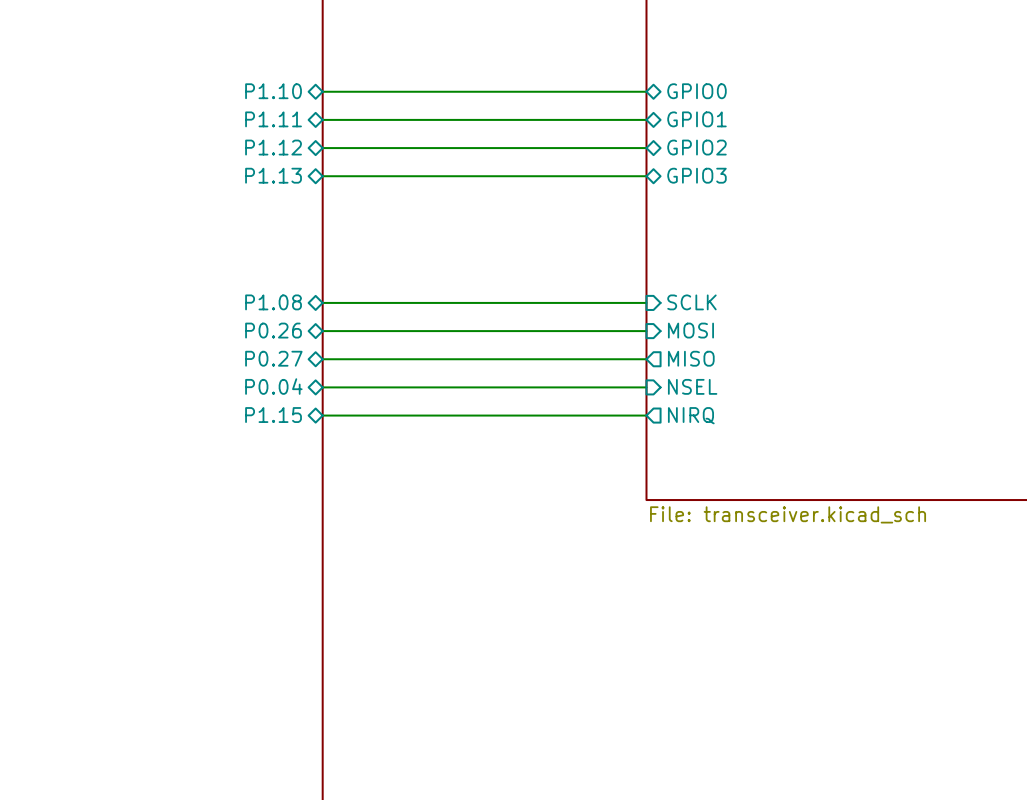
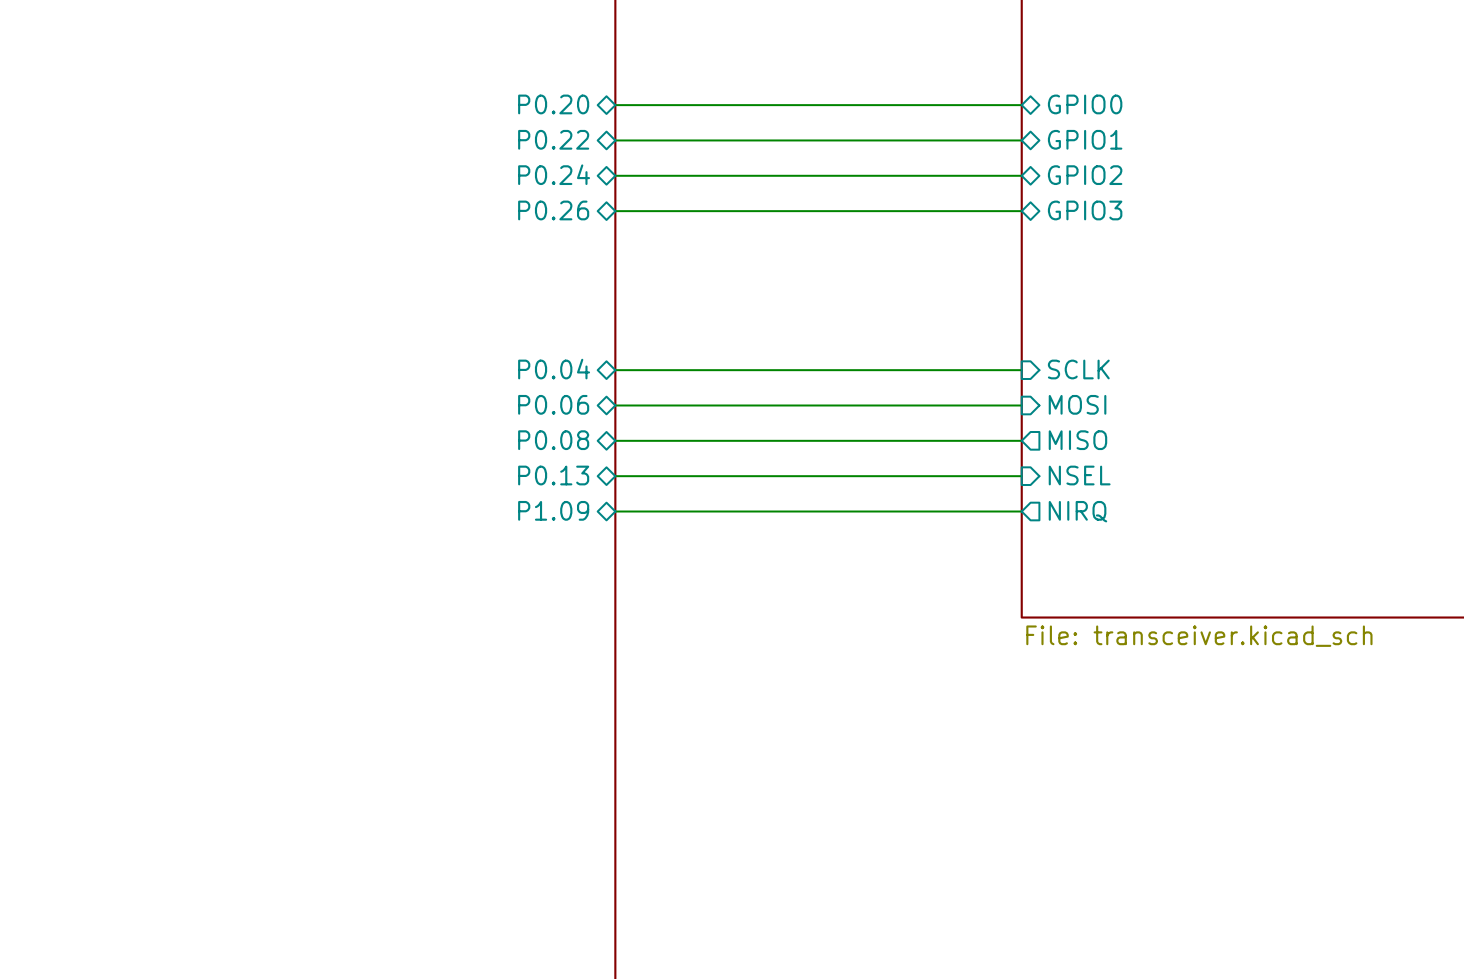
sheet pin: P1.10 (273, 91) -> P0.20 (553, 104)
sheet pin: P1.11 (273, 119) -> P0.22 (553, 139)
sheet pin: P1.12 (273, 147) -> P0.24 (554, 174)
sheet pin: P1.13 (273, 175) -> P0.26 (553, 210)
sheet pin: P1.08 (273, 302) -> P0.04 (554, 369)
sheet pin: P0.26 (273, 330) -> P0.06 (553, 404)
sheet pin: P0.27 (273, 358) -> P0.08 (553, 440)
sheet pin: P0.04 (273, 386) -> P0.13 (553, 475)
sheet pin: P1.15 (273, 415) -> P1.09 (553, 510)

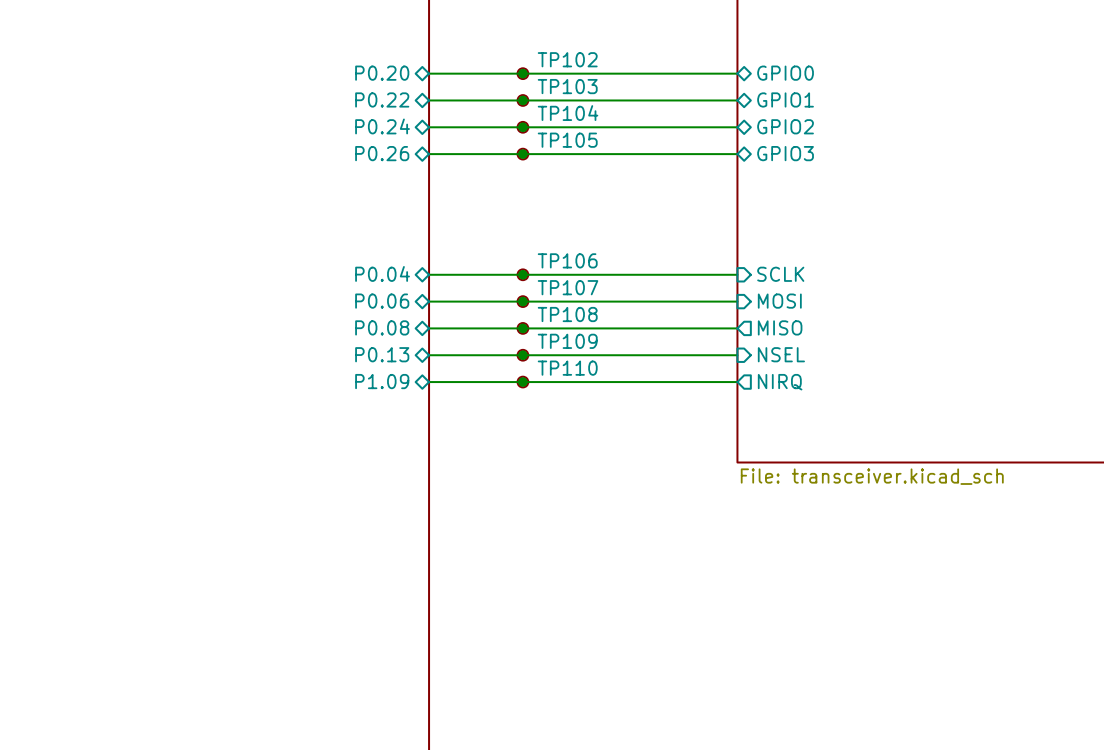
junction: none -> (522, 73)
TP102: none -> (522, 73)
junction: none -> (522, 100)
TP103: none -> (522, 100)
junction: none -> (522, 127)
TP104: none -> (522, 127)
junction: none -> (522, 154)
TP105: none -> (522, 154)
junction: none -> (522, 274)
TP106: none -> (522, 274)
junction: none -> (522, 301)
TP107: none -> (522, 301)
junction: none -> (522, 328)
TP108: none -> (522, 328)
junction: none -> (522, 355)
TP109: none -> (522, 355)
junction: none -> (522, 382)
TP110: none -> (522, 382)

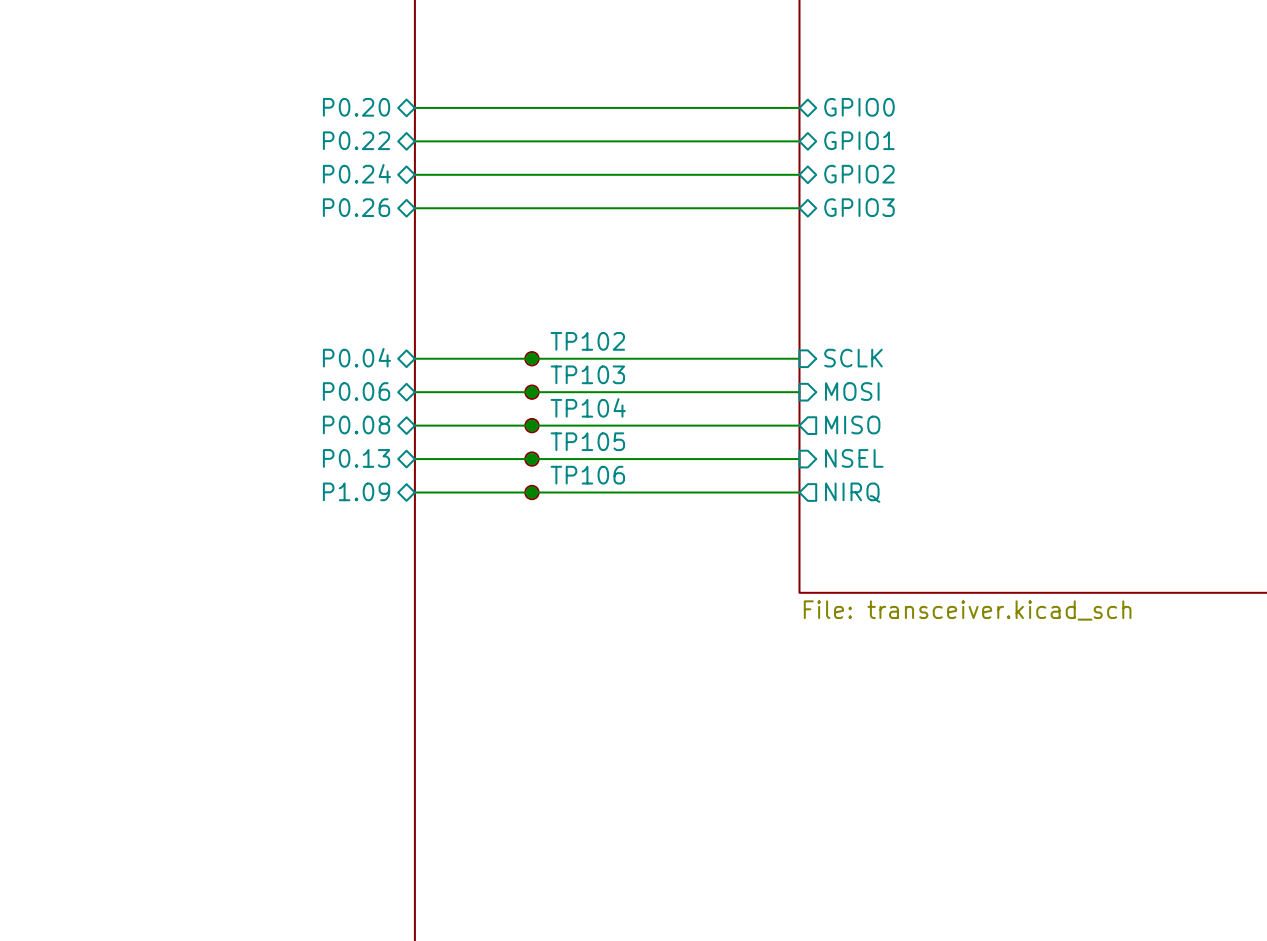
junction: (522, 73) -> none
TP102: (522, 73) -> none
junction: (522, 100) -> none
TP103: (522, 100) -> none
junction: (522, 127) -> none
TP104: (522, 127) -> none
junction: (522, 154) -> none
TP105: (522, 154) -> none
TP106 name: TP106 (567, 260) -> TP102 (587, 341)
TP107 name: TP107 (568, 287) -> TP103 (587, 374)
TP108 name: TP108 (567, 314) -> TP104 (588, 407)
TP109 name: TP109 (567, 341) -> TP105 (587, 441)
TP110 name: TP110 (567, 368) -> TP106 (587, 475)

